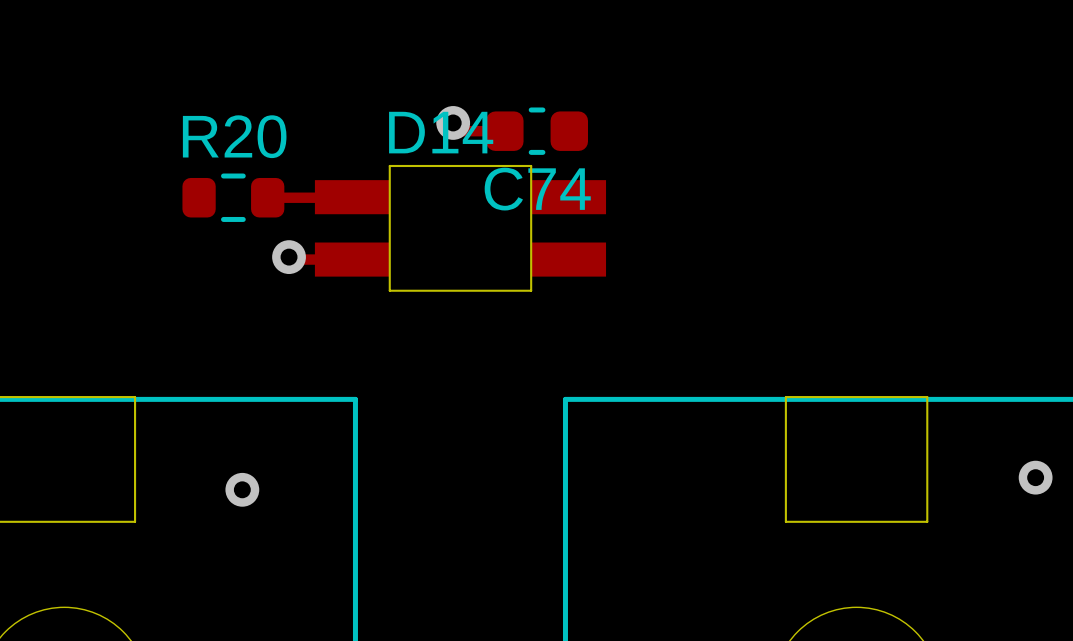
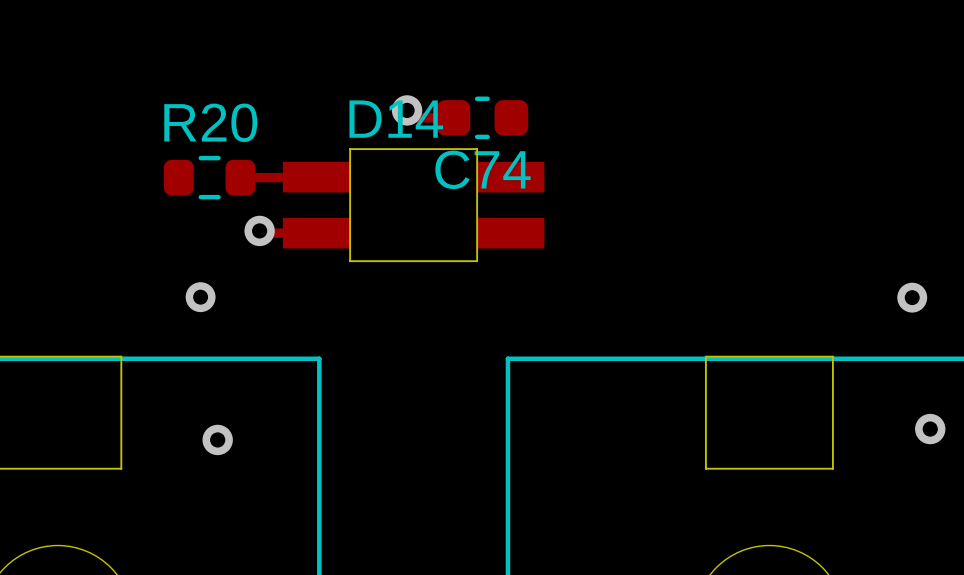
via: none -> (200, 297)
via: none -> (912, 297)

